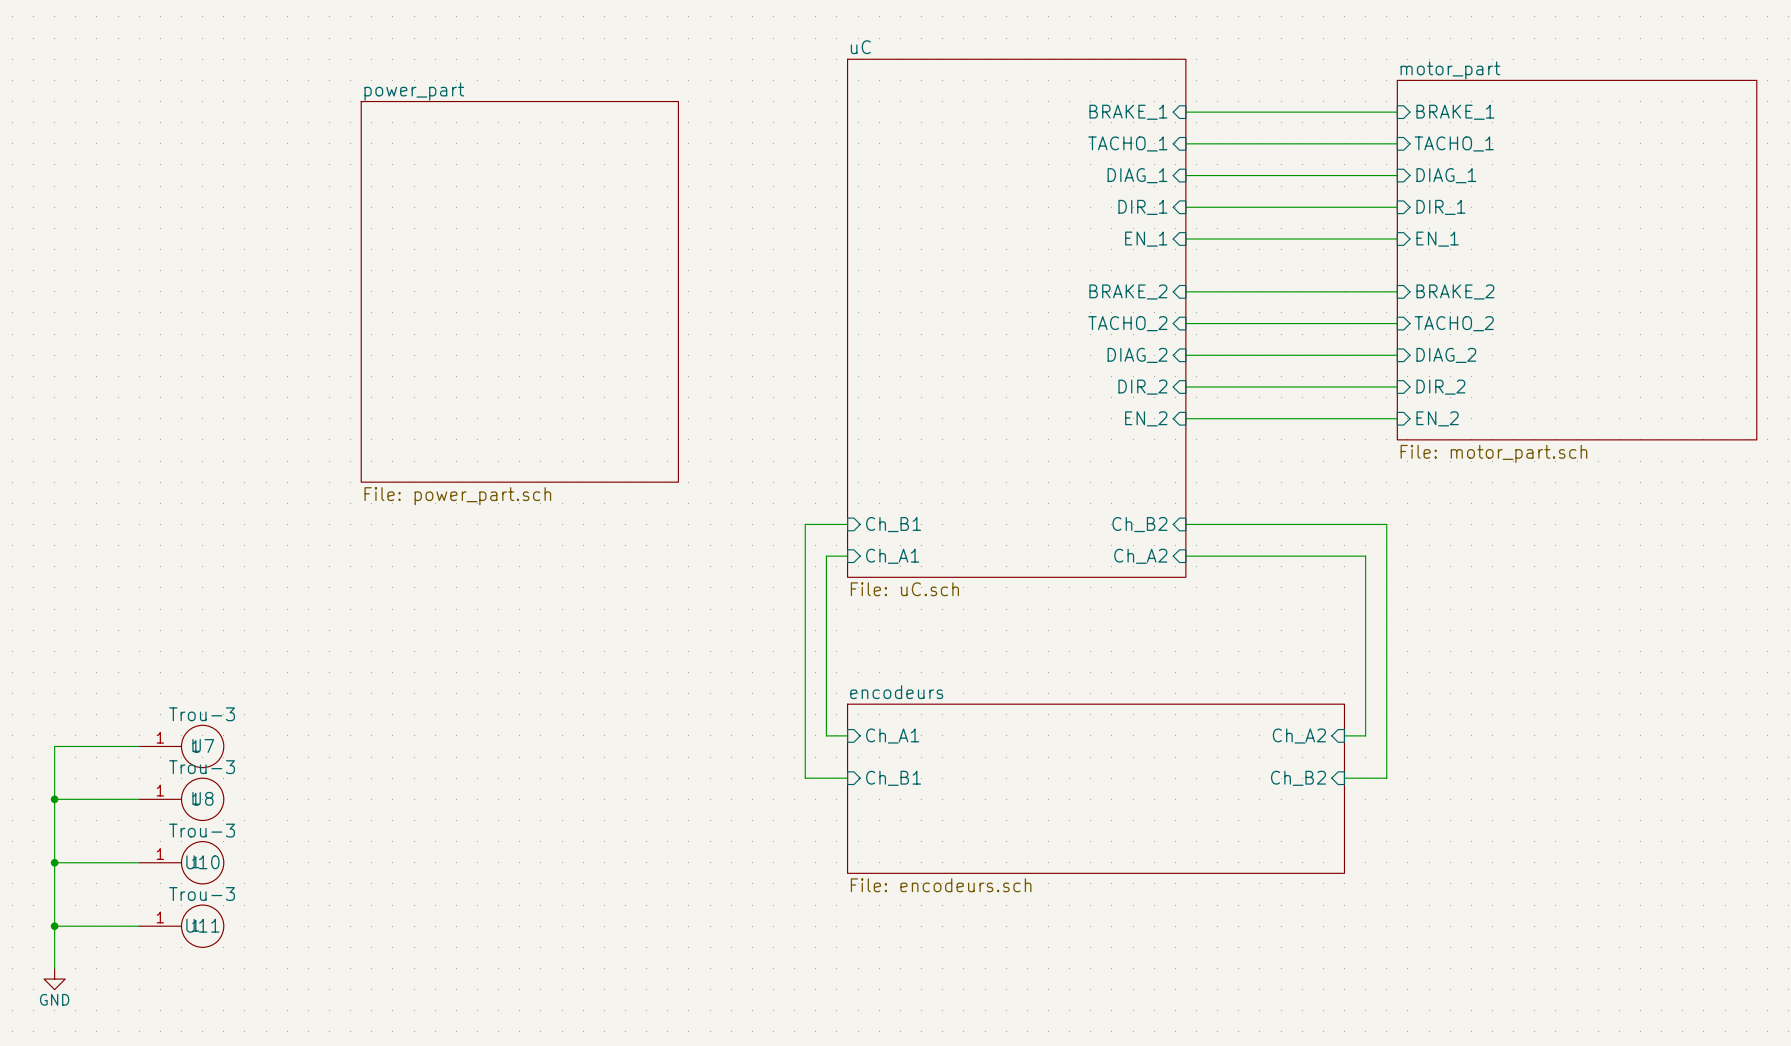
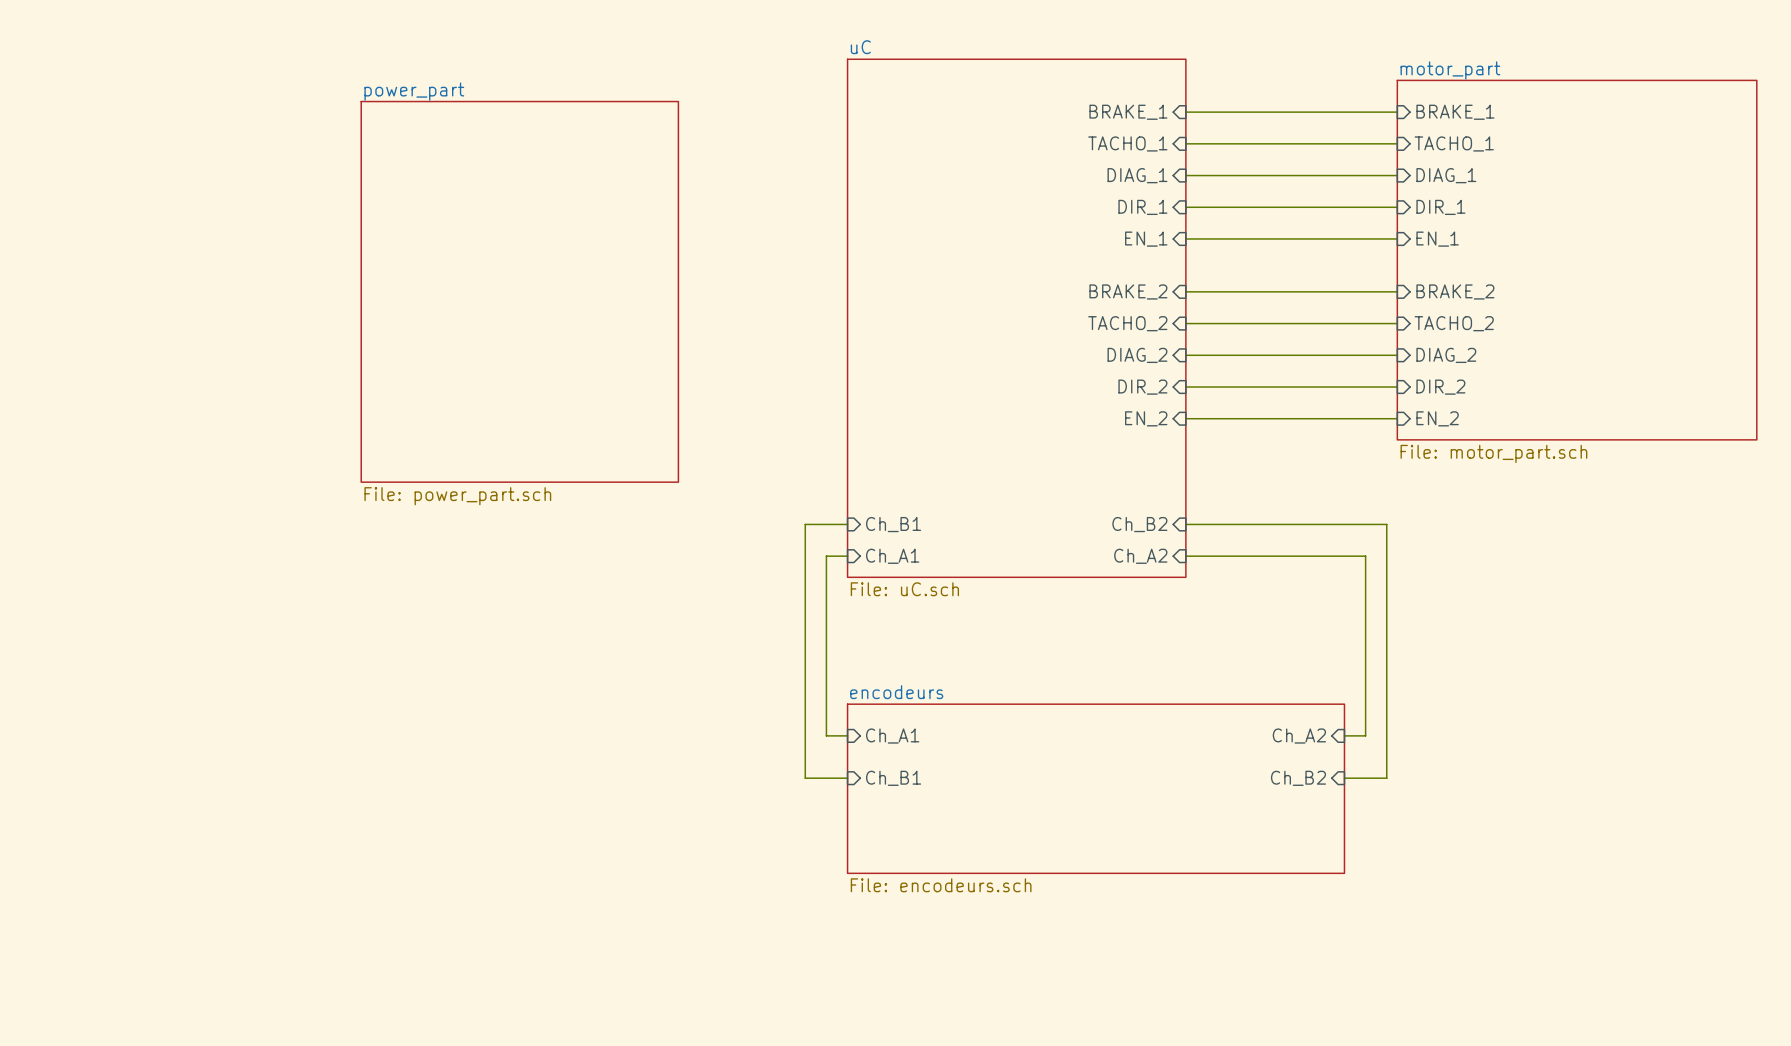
wire: (139, 746) (54, 746) (54, 968) -> none
U7: Trou-3 (181, 746) -> none
wire: (54, 799) (139, 799) -> none
junction: (54, 799) -> none
U8: Trou-3 (181, 799) -> none
wire: (54, 862) (139, 862) -> none
junction: (54, 862) -> none
U10: Trou-3 (181, 862) -> none
wire: (54, 926) (139, 926) -> none
junction: (54, 926) -> none
U11: Trou-3 (181, 926) -> none
power symbol: GND (54, 979) -> none

